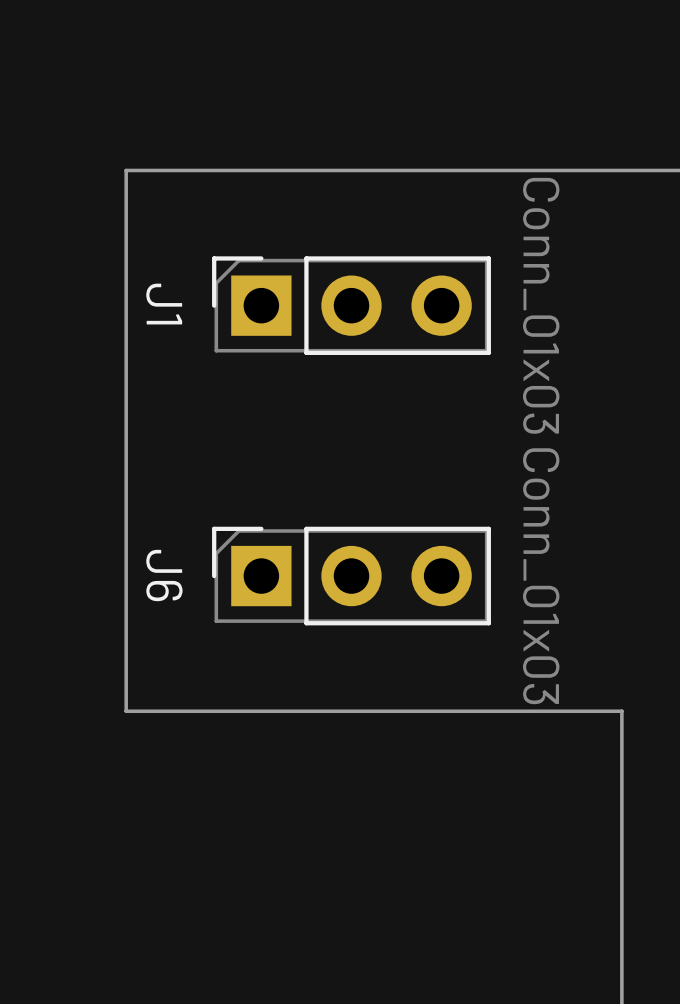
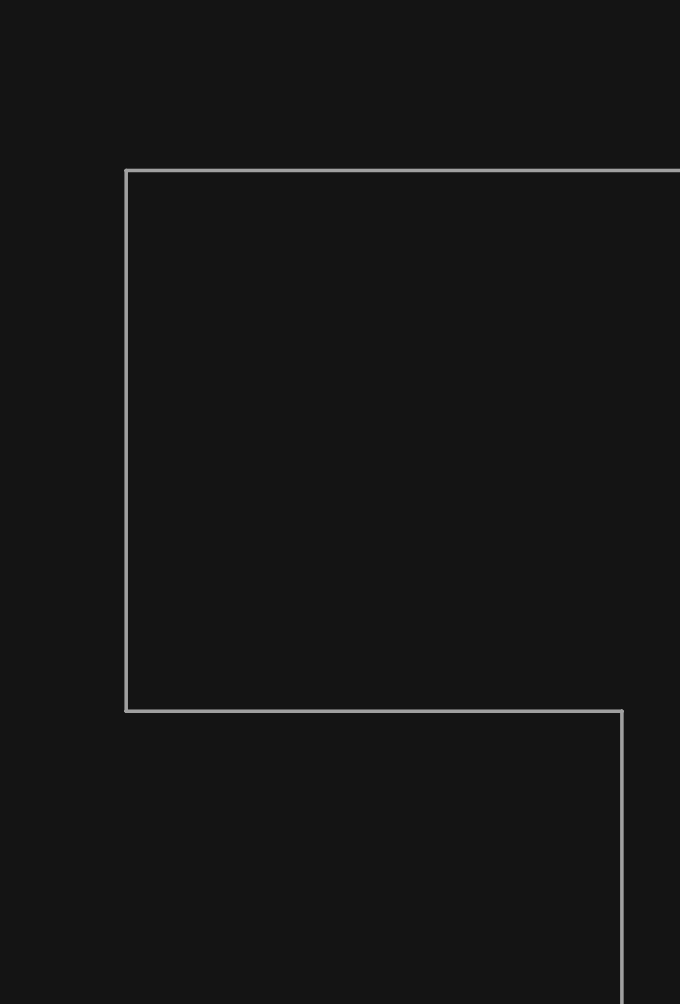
J1: Conn_01x03 (351, 305) -> none
J6: Conn_01x03 (351, 576) -> none

